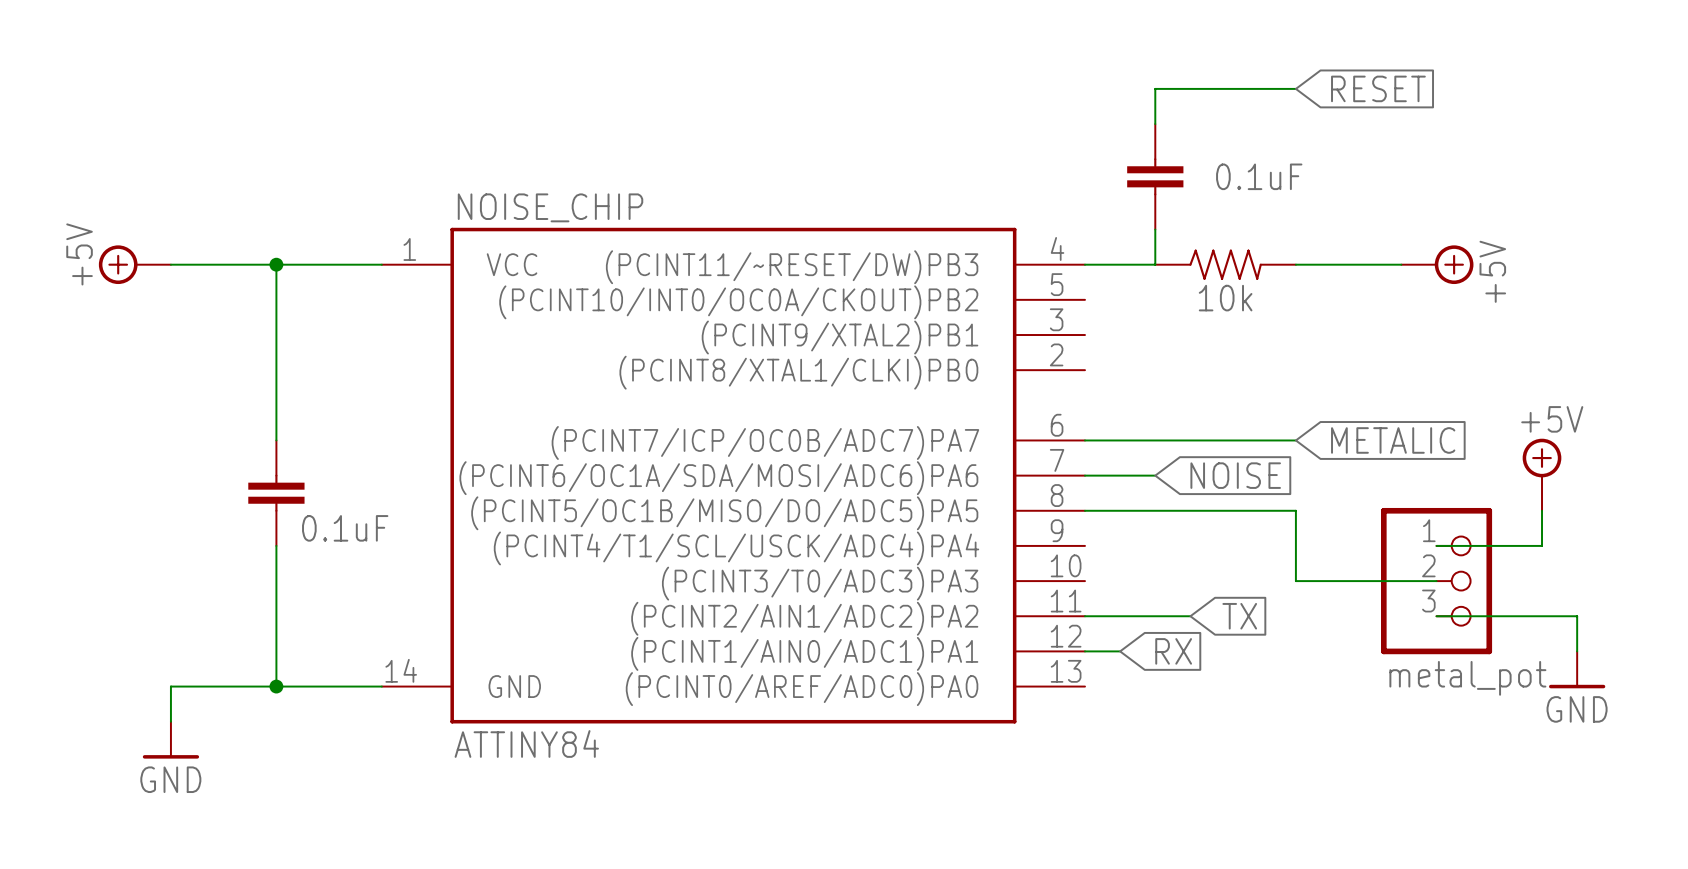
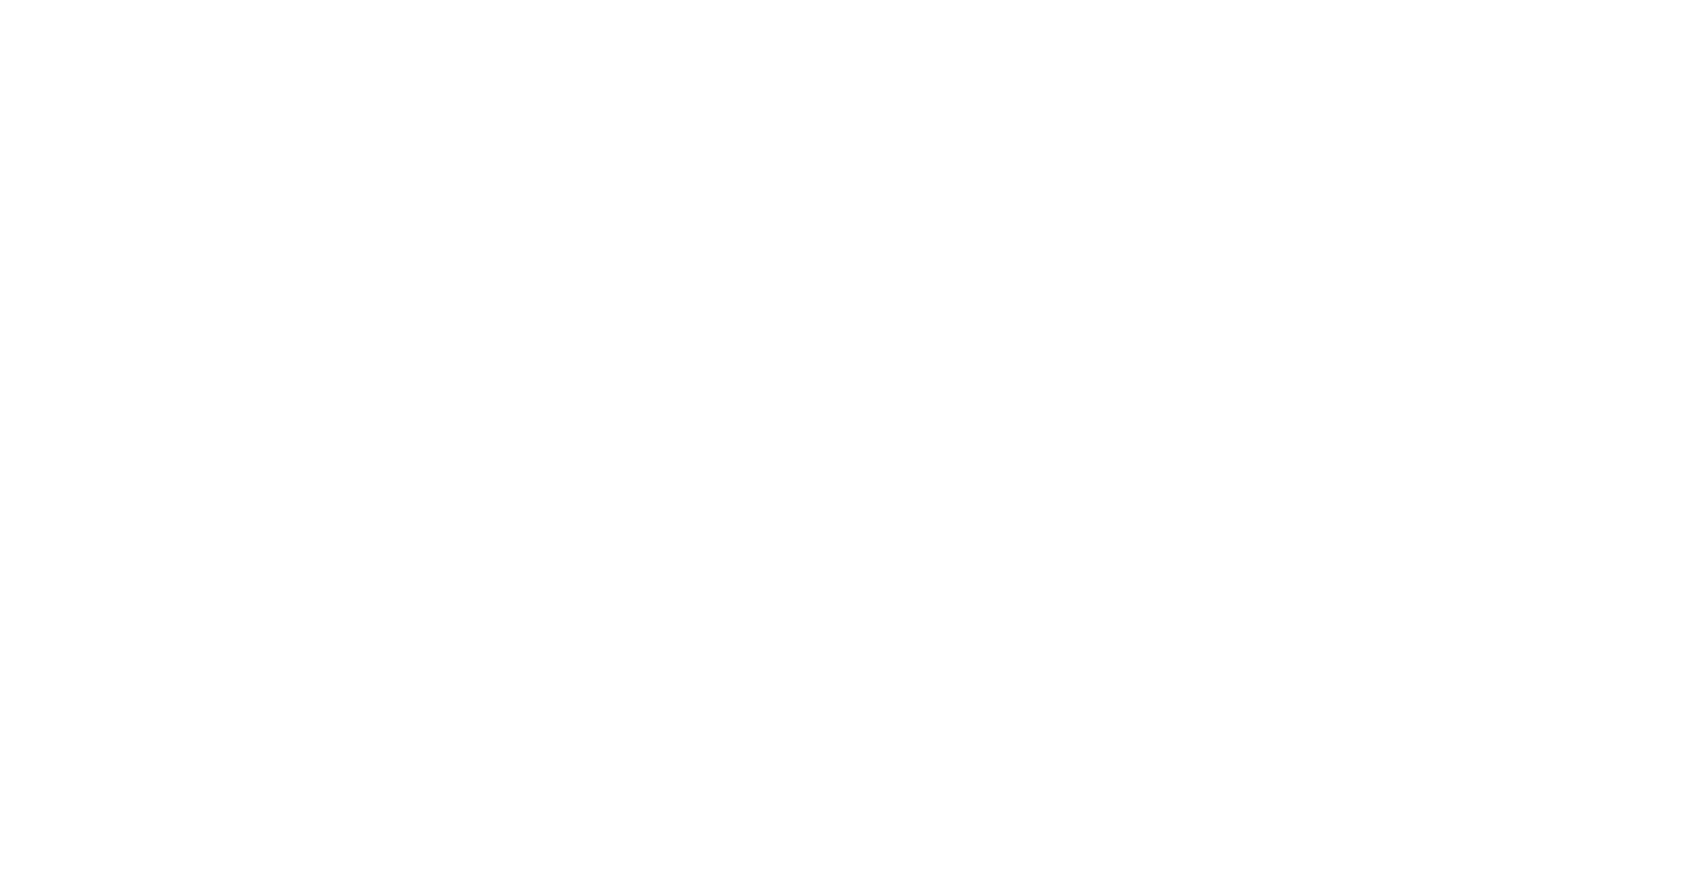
wire: (1295, 88) (1155, 88) (1155, 124) -> none
global label: RESET (1378, 88) -> none
part: 0.1uF (1155, 176) -> none
wire: (1155, 229) (1155, 264) (1084, 264) -> none
power symbol: +5V (134, 264) -> none
wire: (170, 264) (381, 264) -> none
wire: (276, 264) (276, 440) -> none
junction: (276, 264) -> none
part: 10k (1225, 264) -> none
wire: (1295, 264) (1401, 264) -> none
power symbol: +5V (1437, 264) -> none
wire: (1084, 440) (1295, 440) -> none
global label: METALIC (1393, 440) -> none
power symbol: +5V (1542, 474) -> none
NOISE_CHIP: ATTINY84 (733, 475) -> none
wire: (1084, 475) (1155, 475) -> none
global label: NOISE (1235, 475) -> none
part: 0.1uF (276, 493) -> none
wire: (1084, 510) (1295, 510) (1295, 581) (1436, 581) -> none
wire: (1542, 510) (1542, 545) (1436, 545) -> none
wire: (276, 545) (276, 686) -> none
part: metal_pot (1436, 581) -> none
wire: (1084, 616) (1190, 616) -> none
global label: TX (1239, 616) -> none
wire: (1436, 616) (1577, 616) (1577, 651) -> none
wire: (1084, 651) (1120, 651) -> none
global label: RX (1173, 651) -> none
power symbol: GND (1577, 669) -> none
junction: (276, 686) -> none
wire: (381, 686) (170, 686) (170, 721) -> none
power symbol: GND (170, 740) -> none

